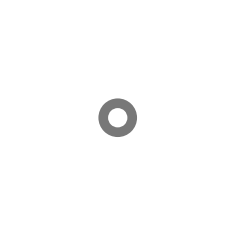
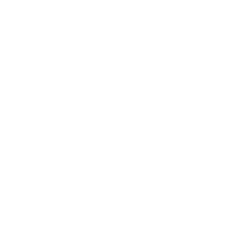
via: (117, 117) -> none

